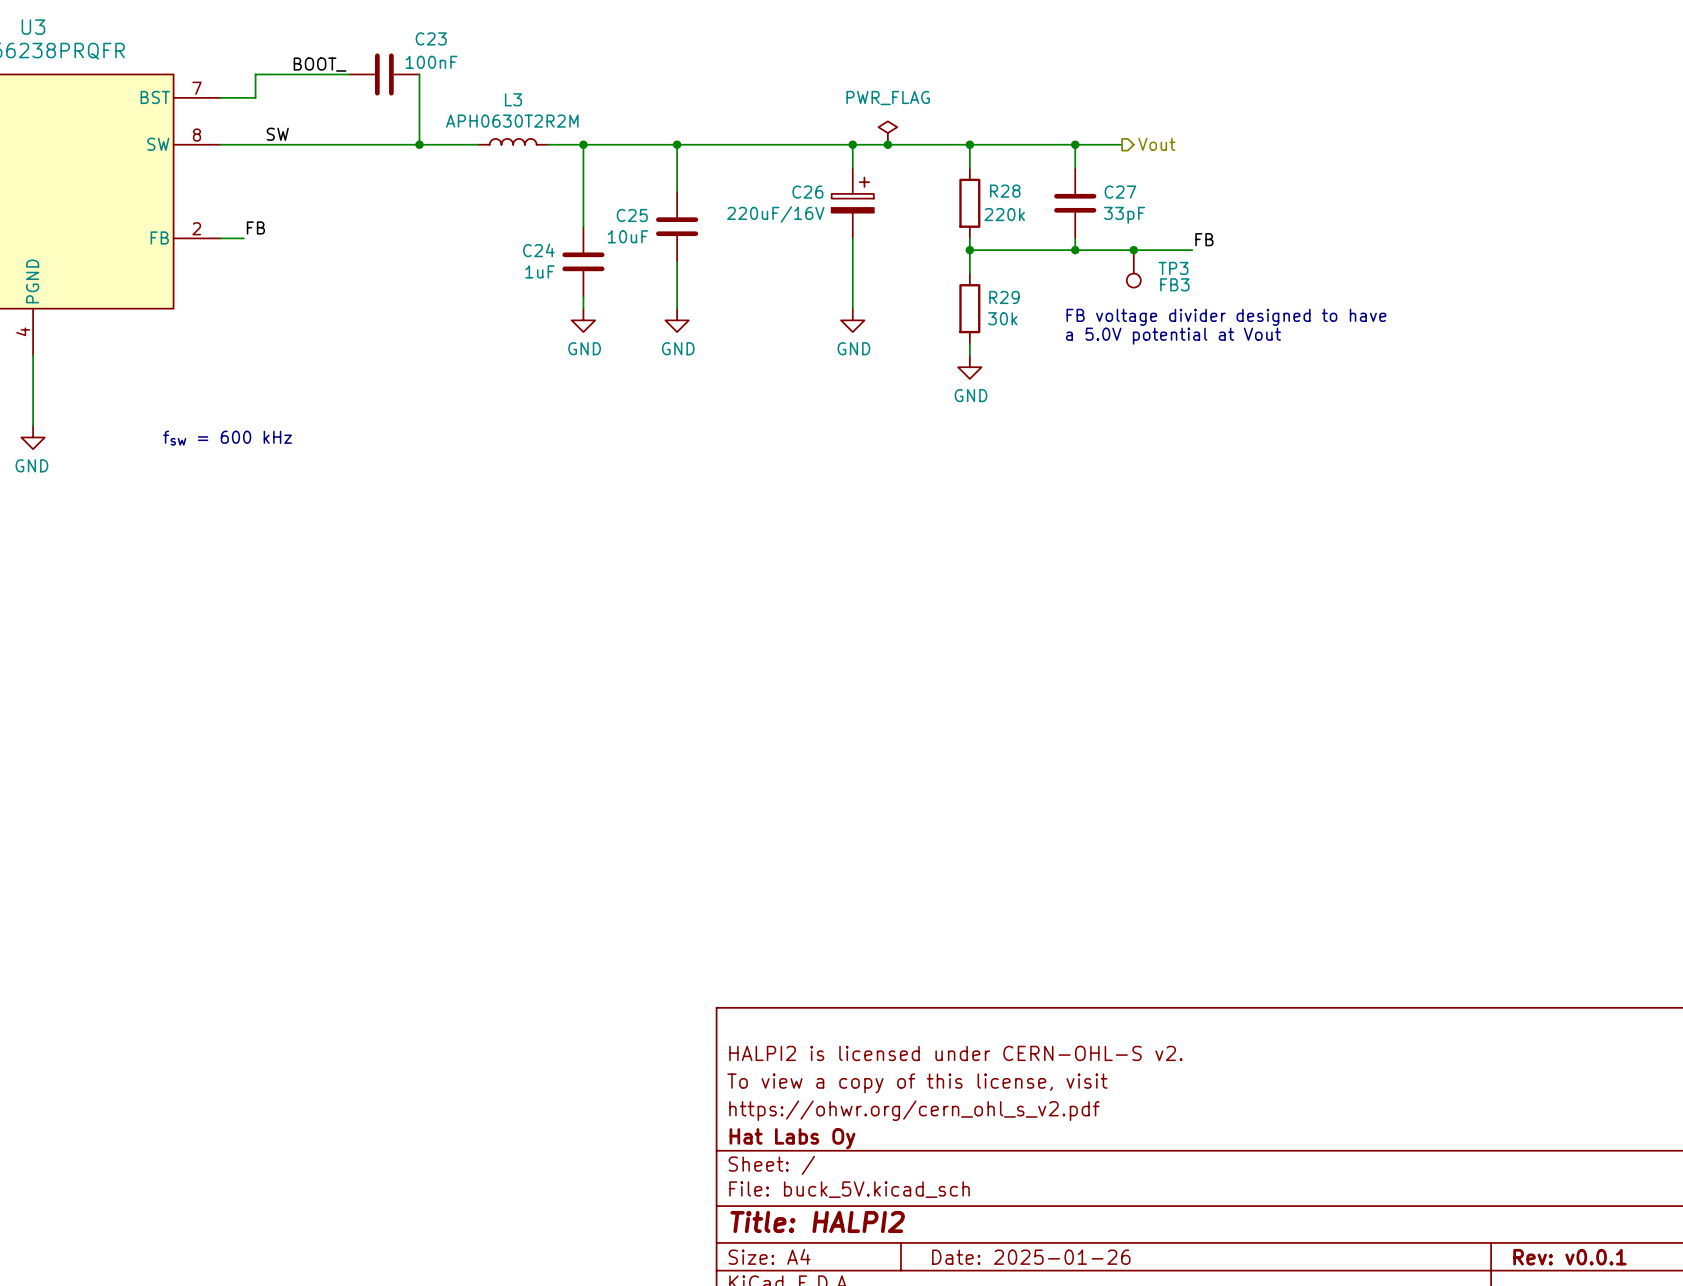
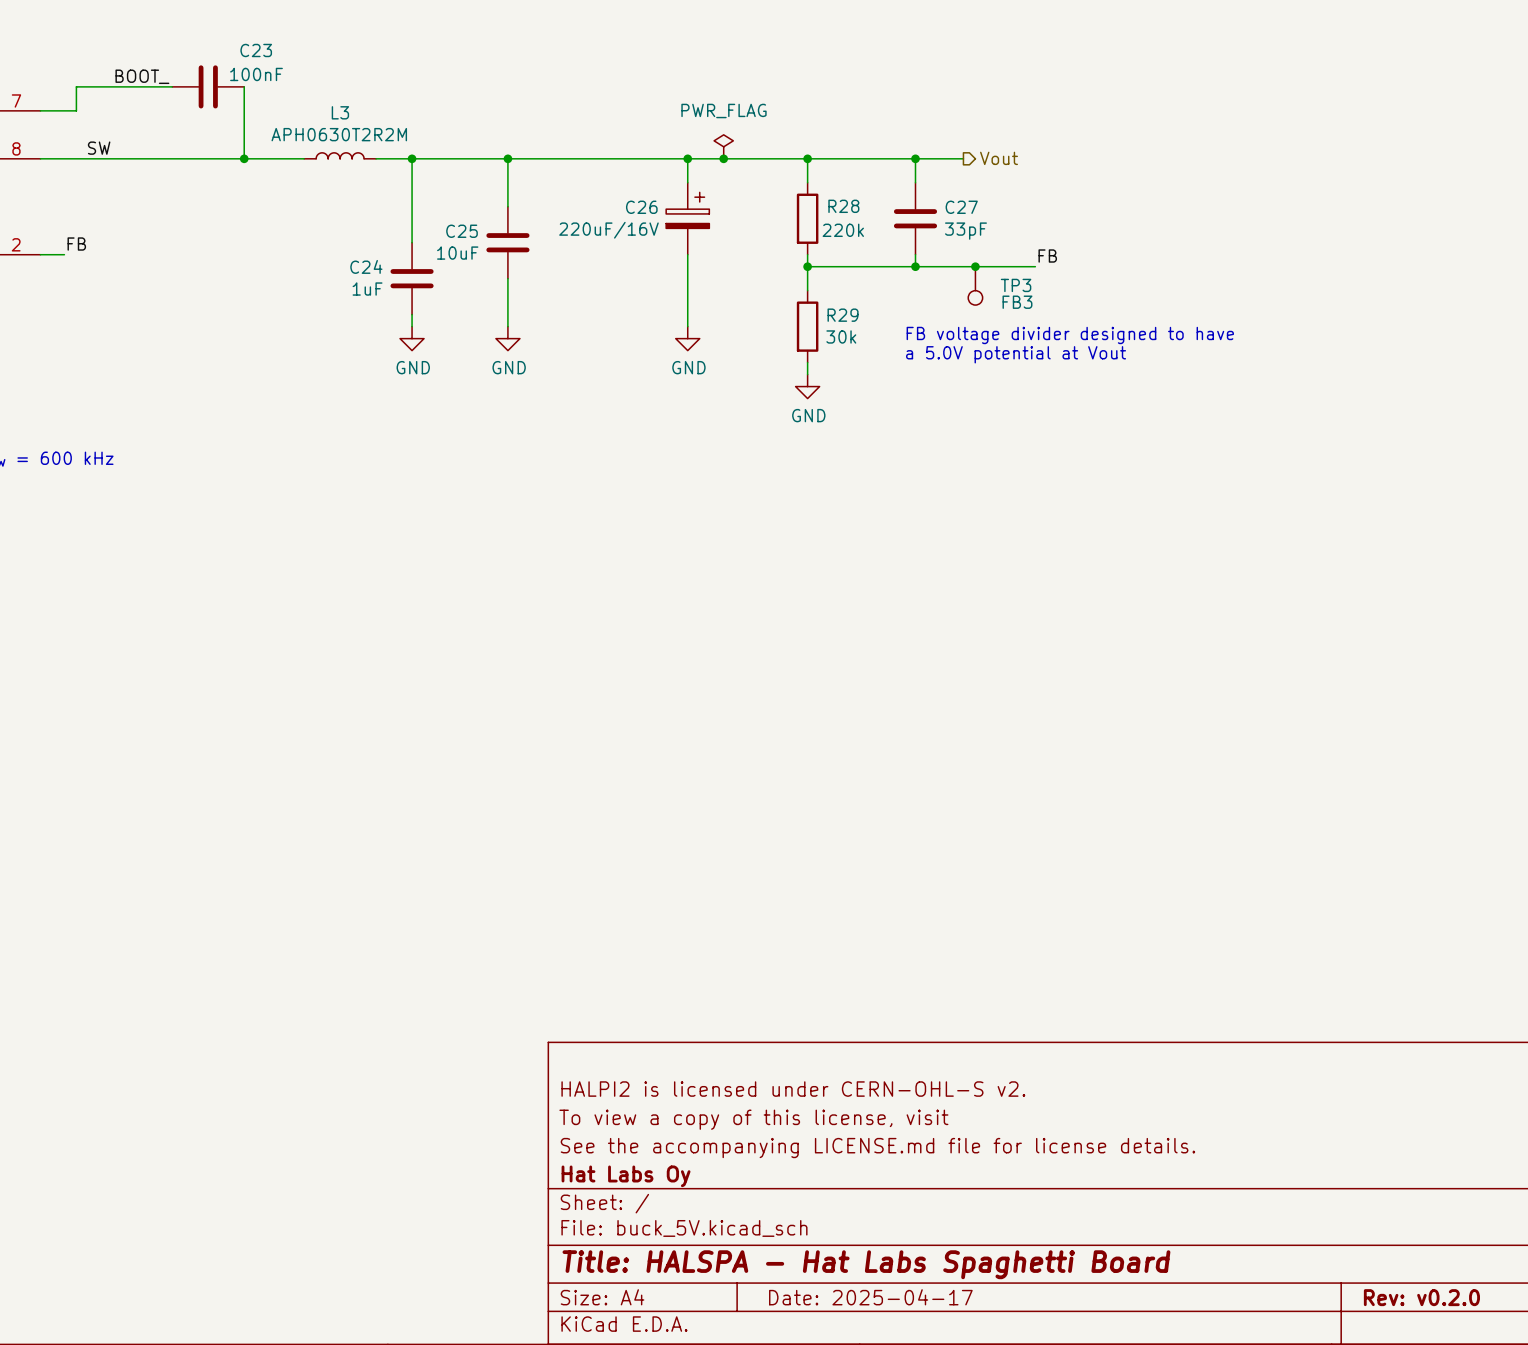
title block: https://ohwr.org/cern_ohl_s_v2.pdf (914, 1110) -> See the accompanying LICENSE.md file for license details. (877, 1148)
title block: Title: HALPI2 (817, 1221) -> Title: HALSPA - Hat Labs Spaghetti Board (866, 1264)
title block: Date: 2025-01-26 (1031, 1257) -> Date: 2025-04-17 (870, 1297)
title block: Rev: v0.0.1 (1569, 1257) -> Rev: v0.2.0 (1421, 1297)

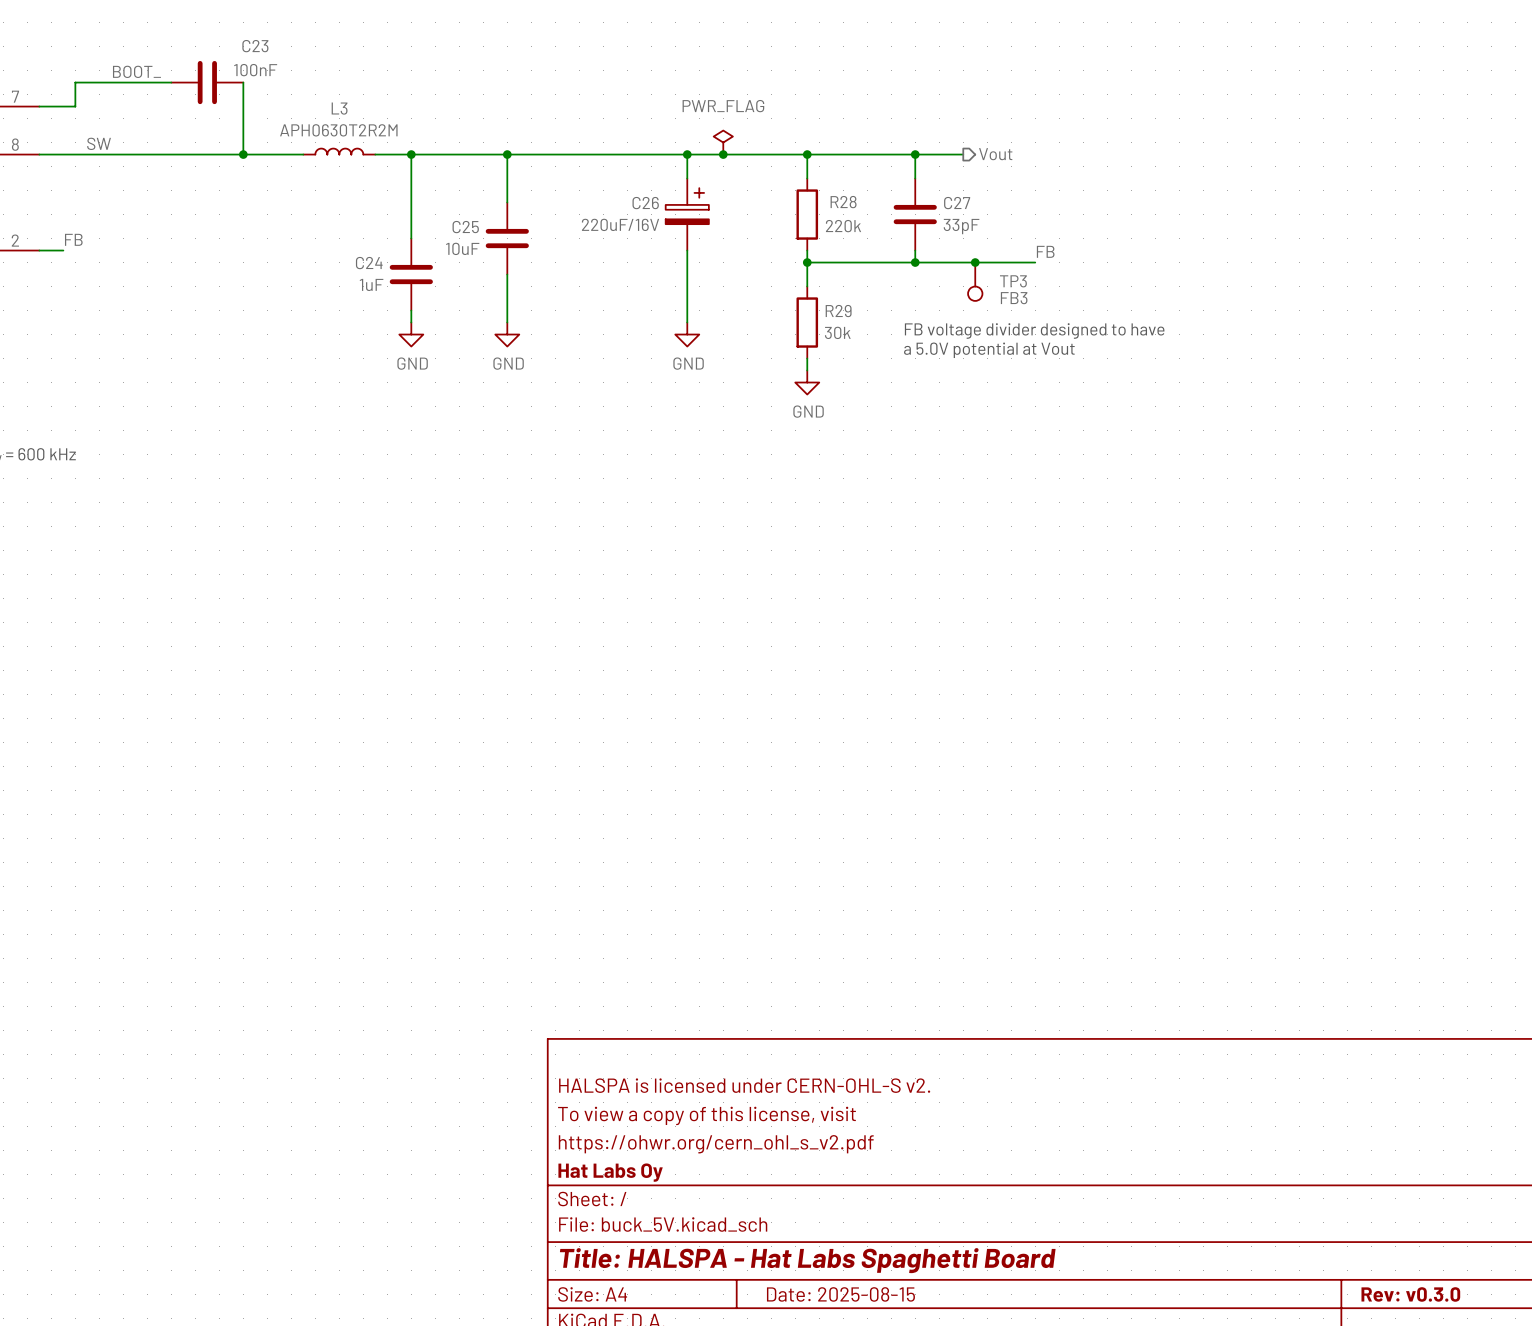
title block: HALPI2 is licensed under CERN-OHL-S v2. (793, 1089) -> HALSPA is licensed under CERN-OHL-S v2. (744, 1085)
title block: See the accompanying LICENSE.md file for license details. (877, 1148) -> https://ohwr.org/cern_ohl_s_v2.pdf (716, 1144)
title block: Date: 2025-04-17 (870, 1297) -> Date: 2025-08-15 (840, 1294)
title block: Rev: v0.2.0 (1421, 1297) -> Rev: v0.3.0 (1410, 1294)

